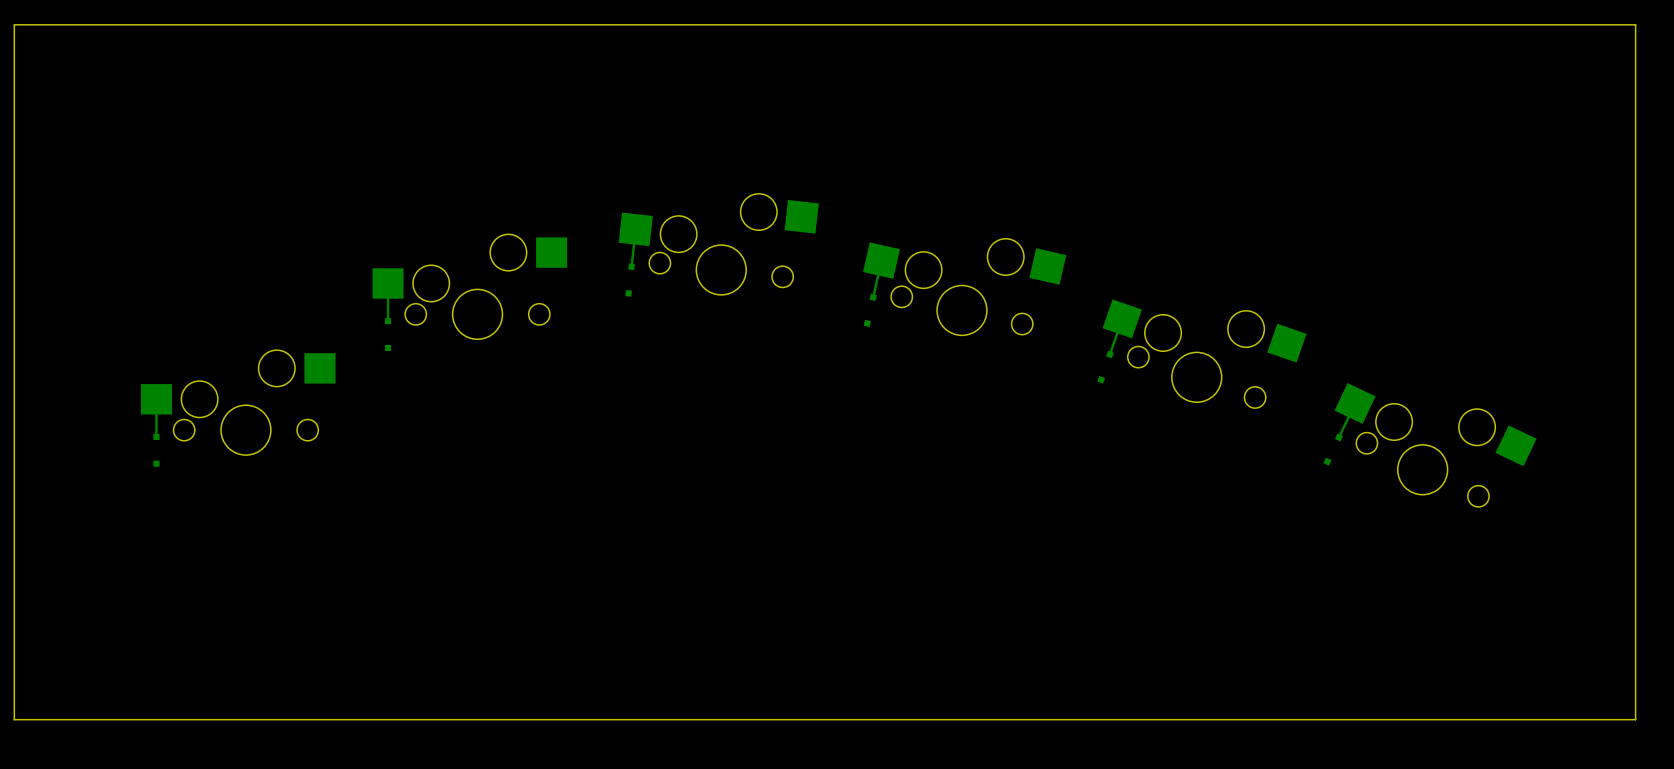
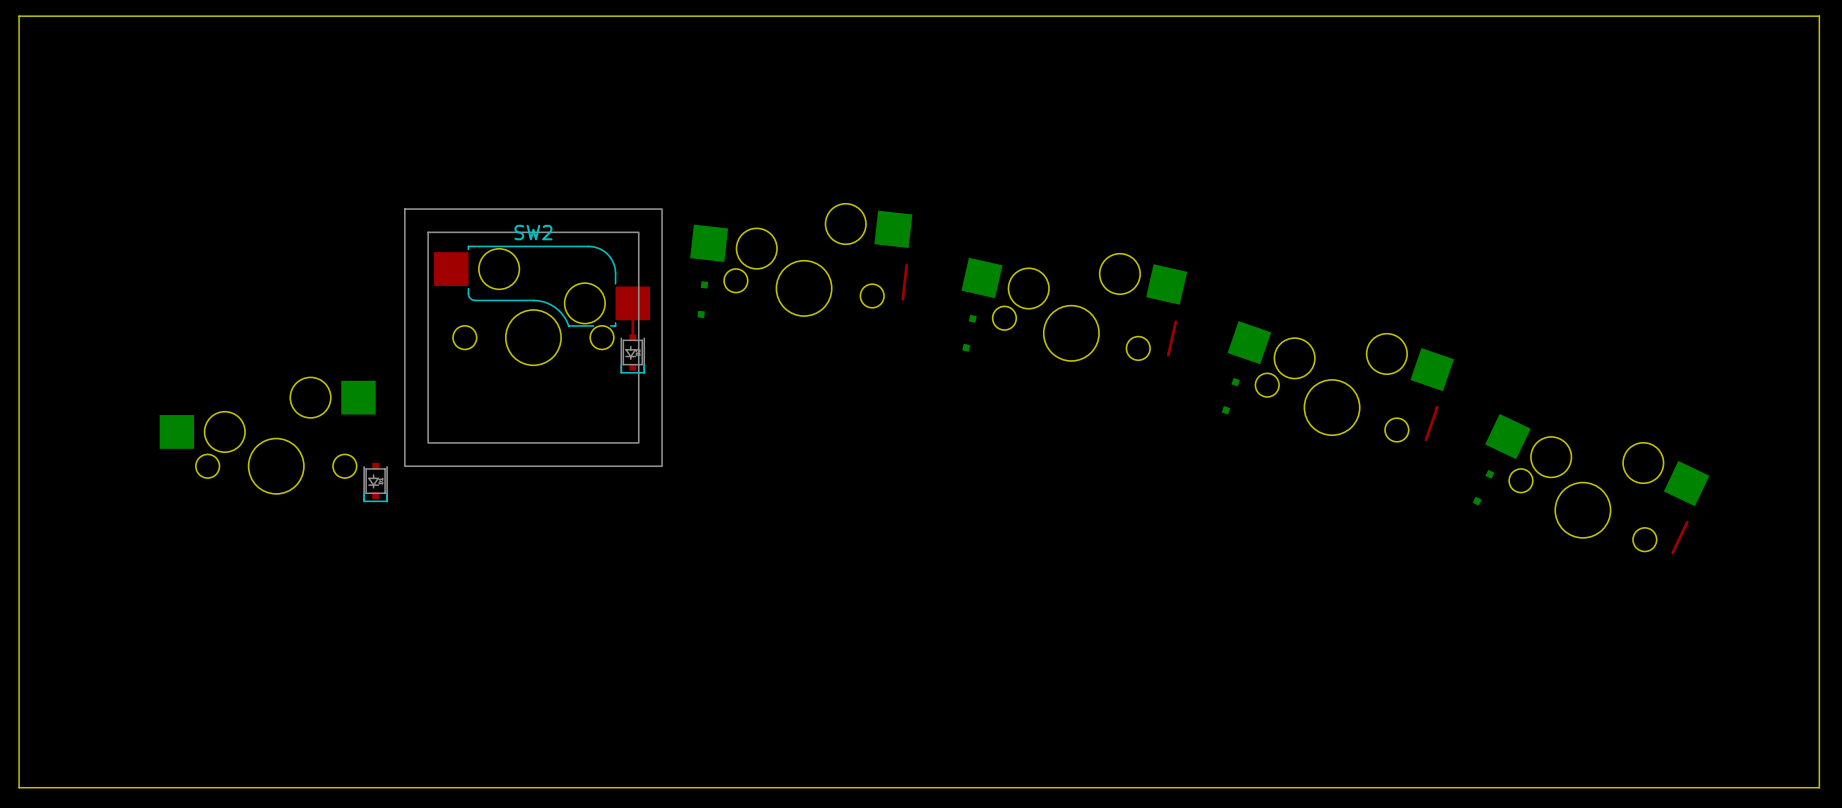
bottom track: (635, 229) (631, 266) -> none
top track: none -> (906, 265) (902, 299)
bottom track: (881, 260) (873, 297) -> none
bottom track: (388, 283) (388, 321) -> none
top track: none -> (632, 303) (632, 337)
SW2 side: bottom (469, 286) -> top (533, 337)
top track: none -> (1175, 321) (1168, 355)
bottom track: (1122, 318) (1109, 354) -> none
part side: bottom (388, 334) -> top (632, 353)
top track: none -> (1435, 408) (1437, 407) (1425, 440)
bottom track: (156, 399) (156, 436) -> none
bottom track: (1355, 403) (1338, 437) -> none
part side: bottom (156, 450) -> top (375, 482)
top track: none -> (1687, 521) (1672, 552)

